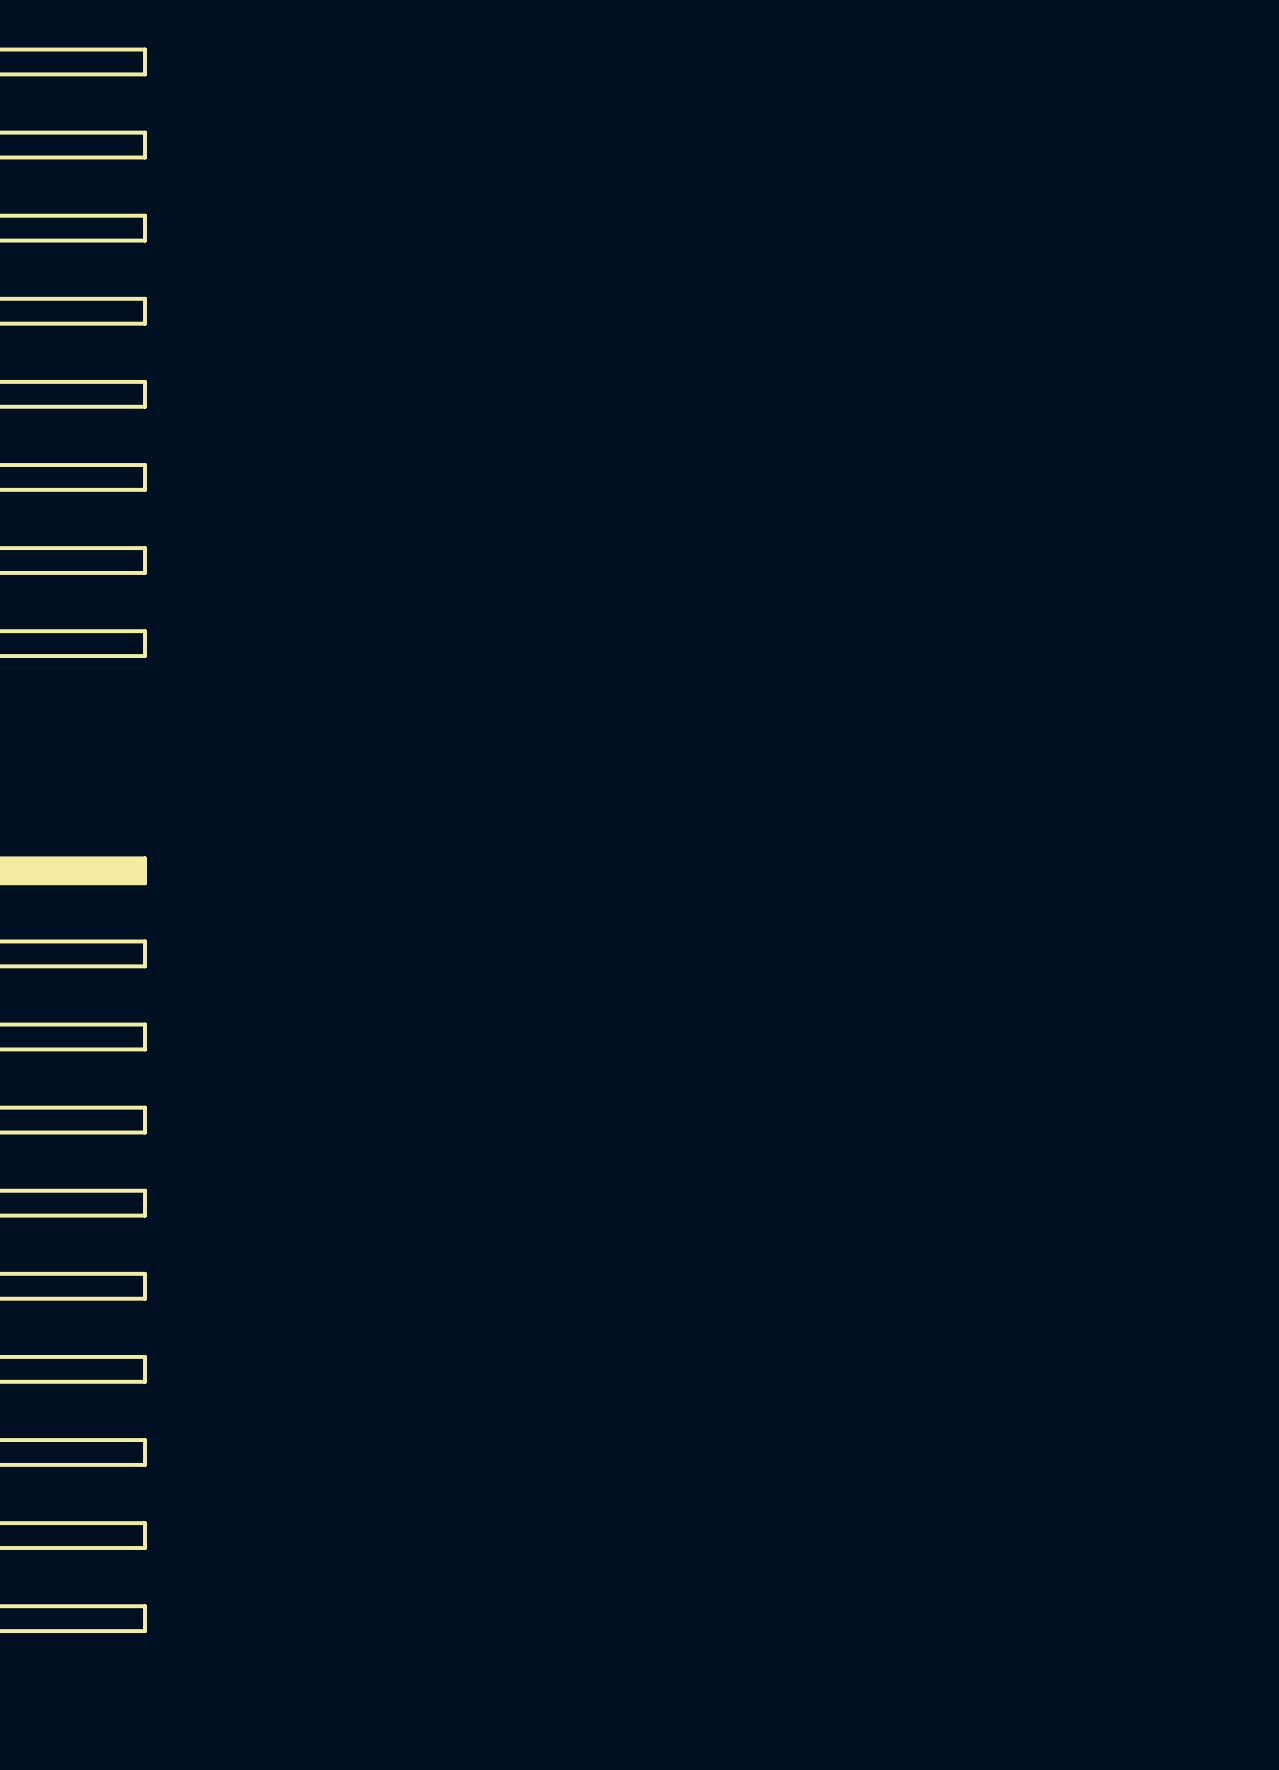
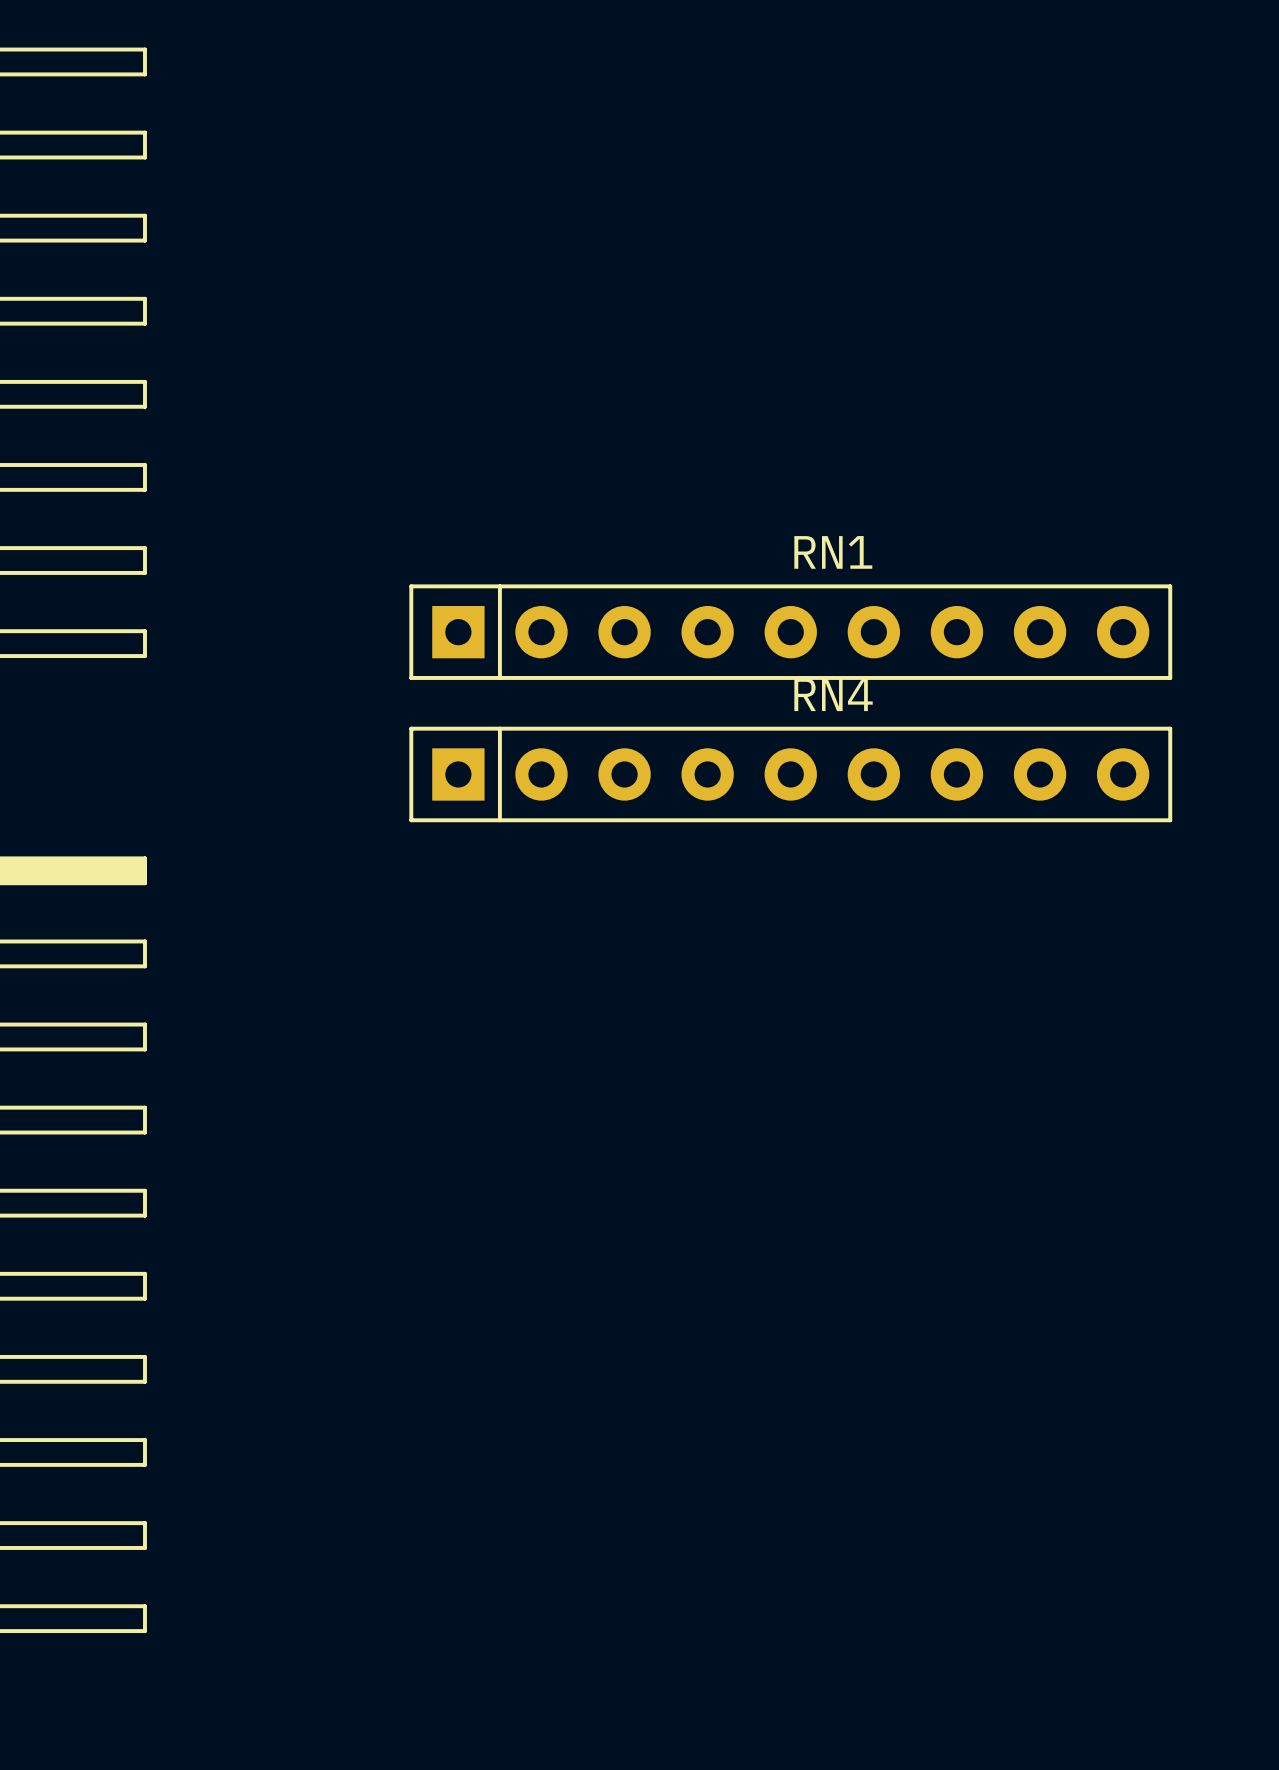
RN1: none -> (790, 632)
RN4: none -> (790, 774)

